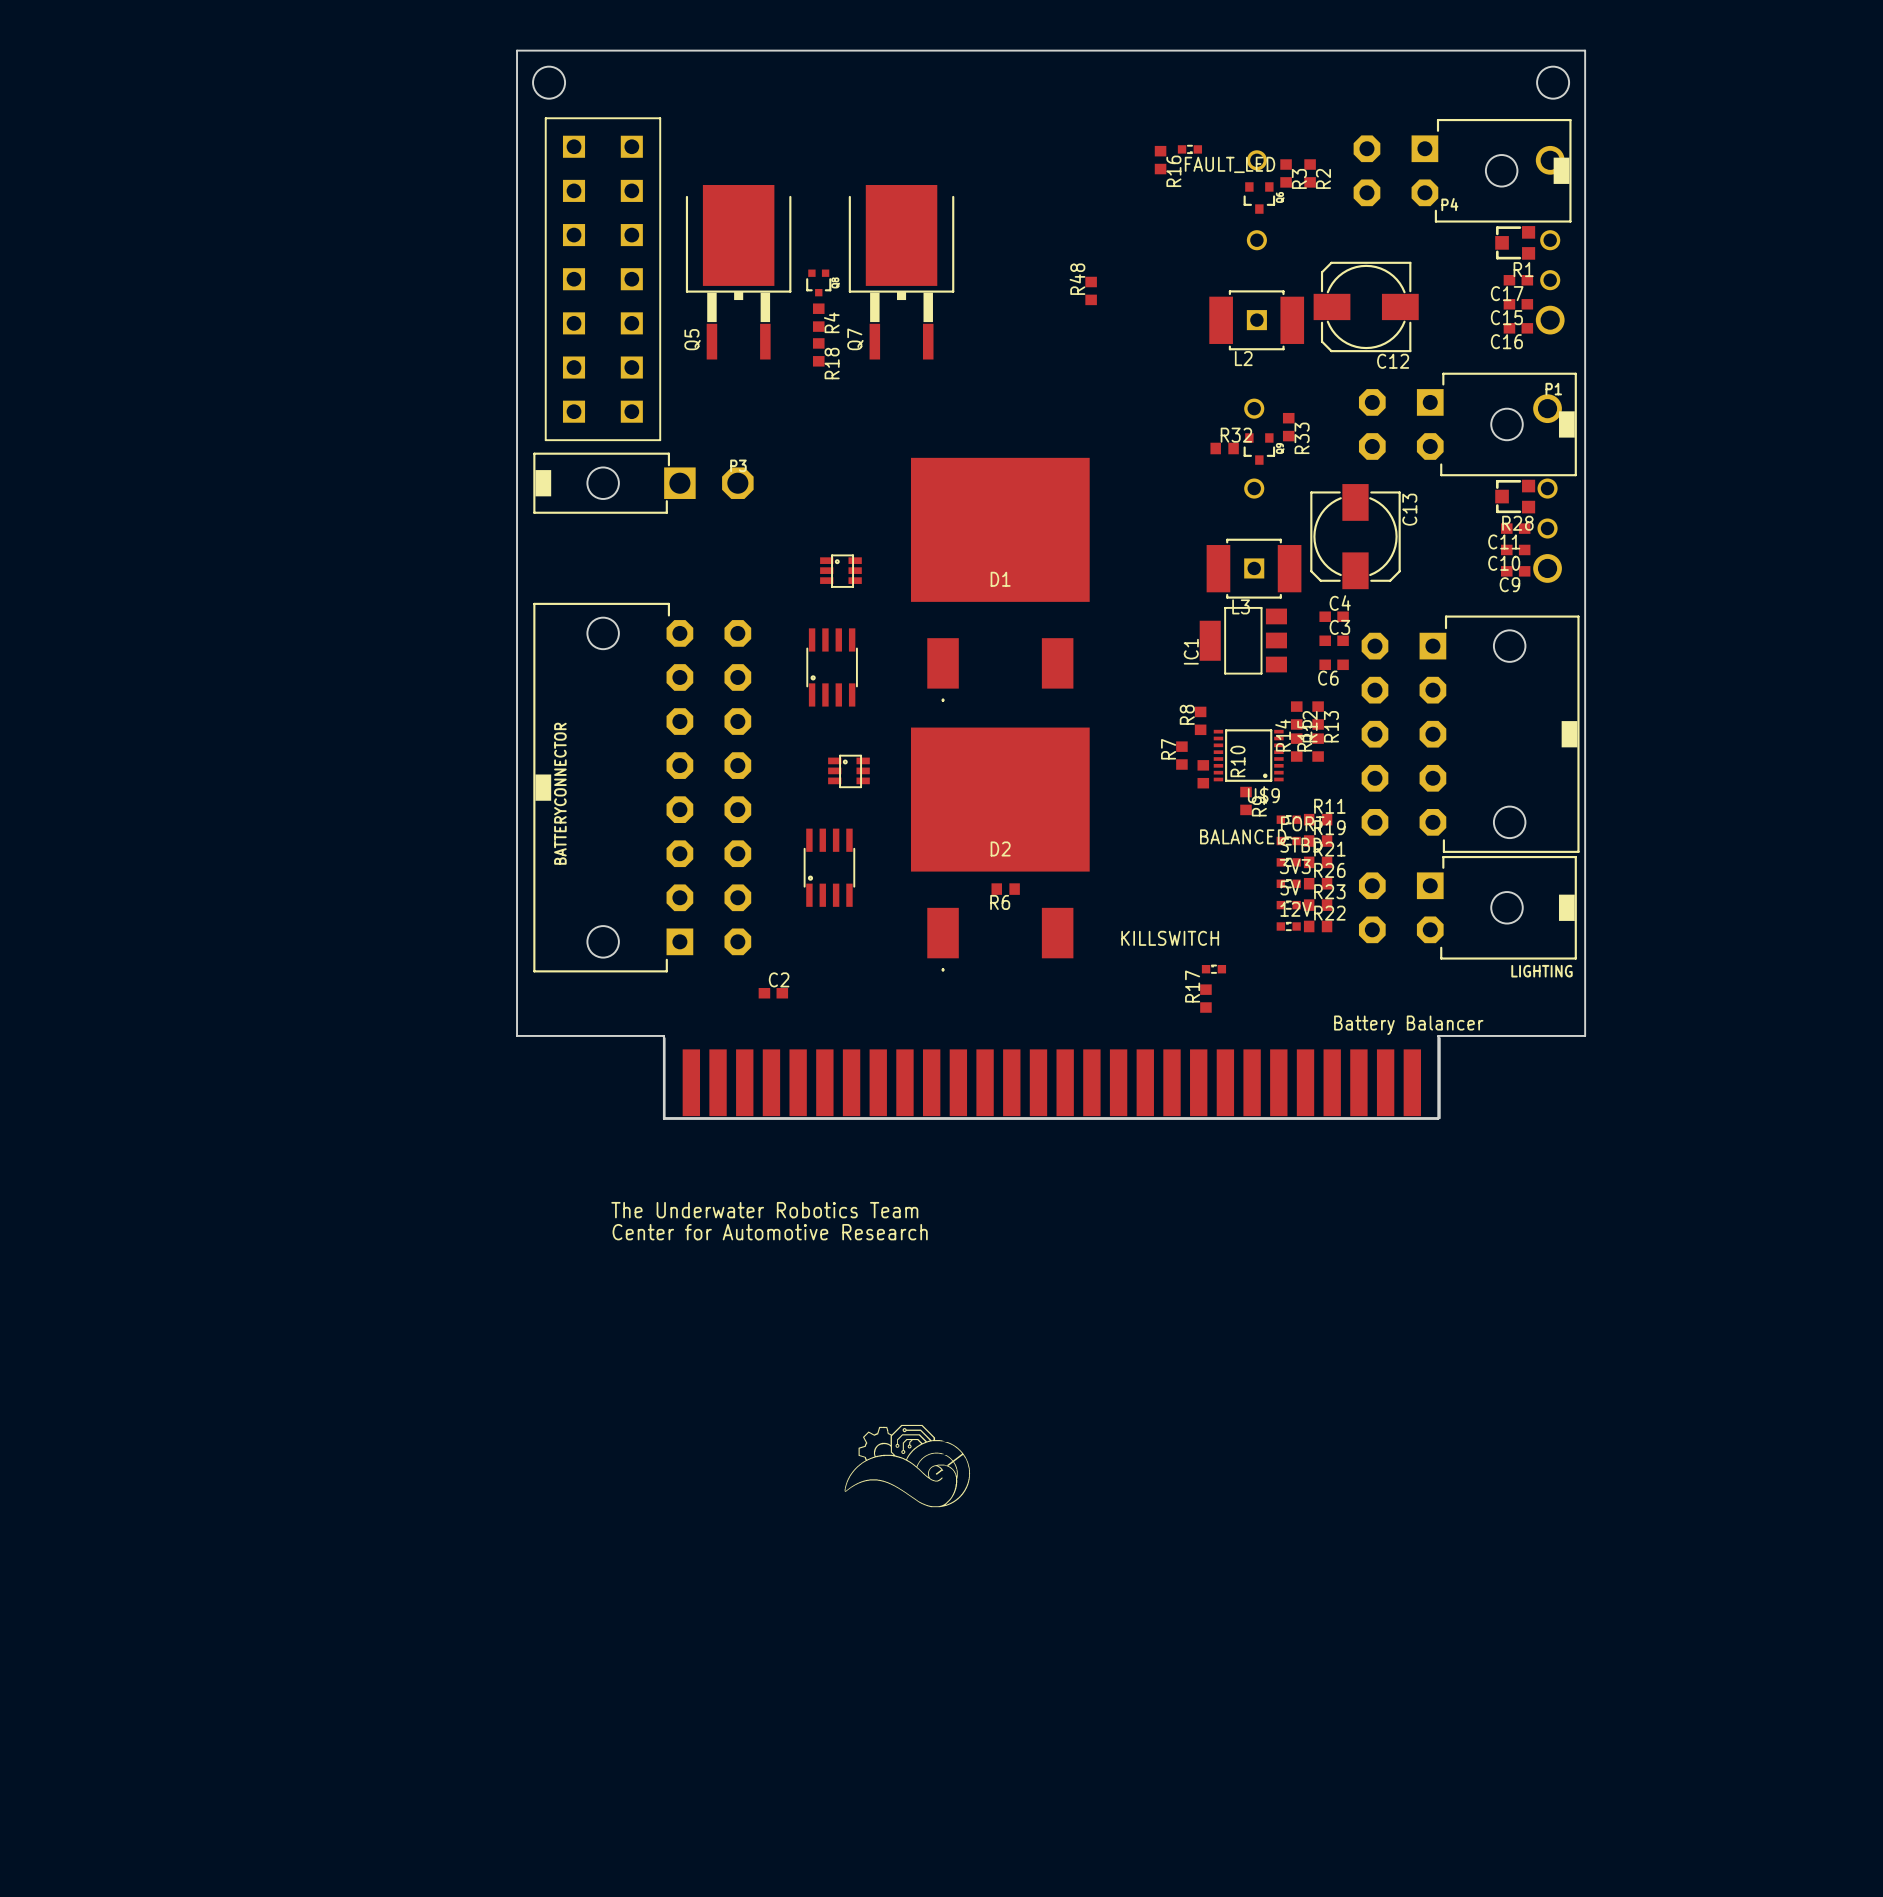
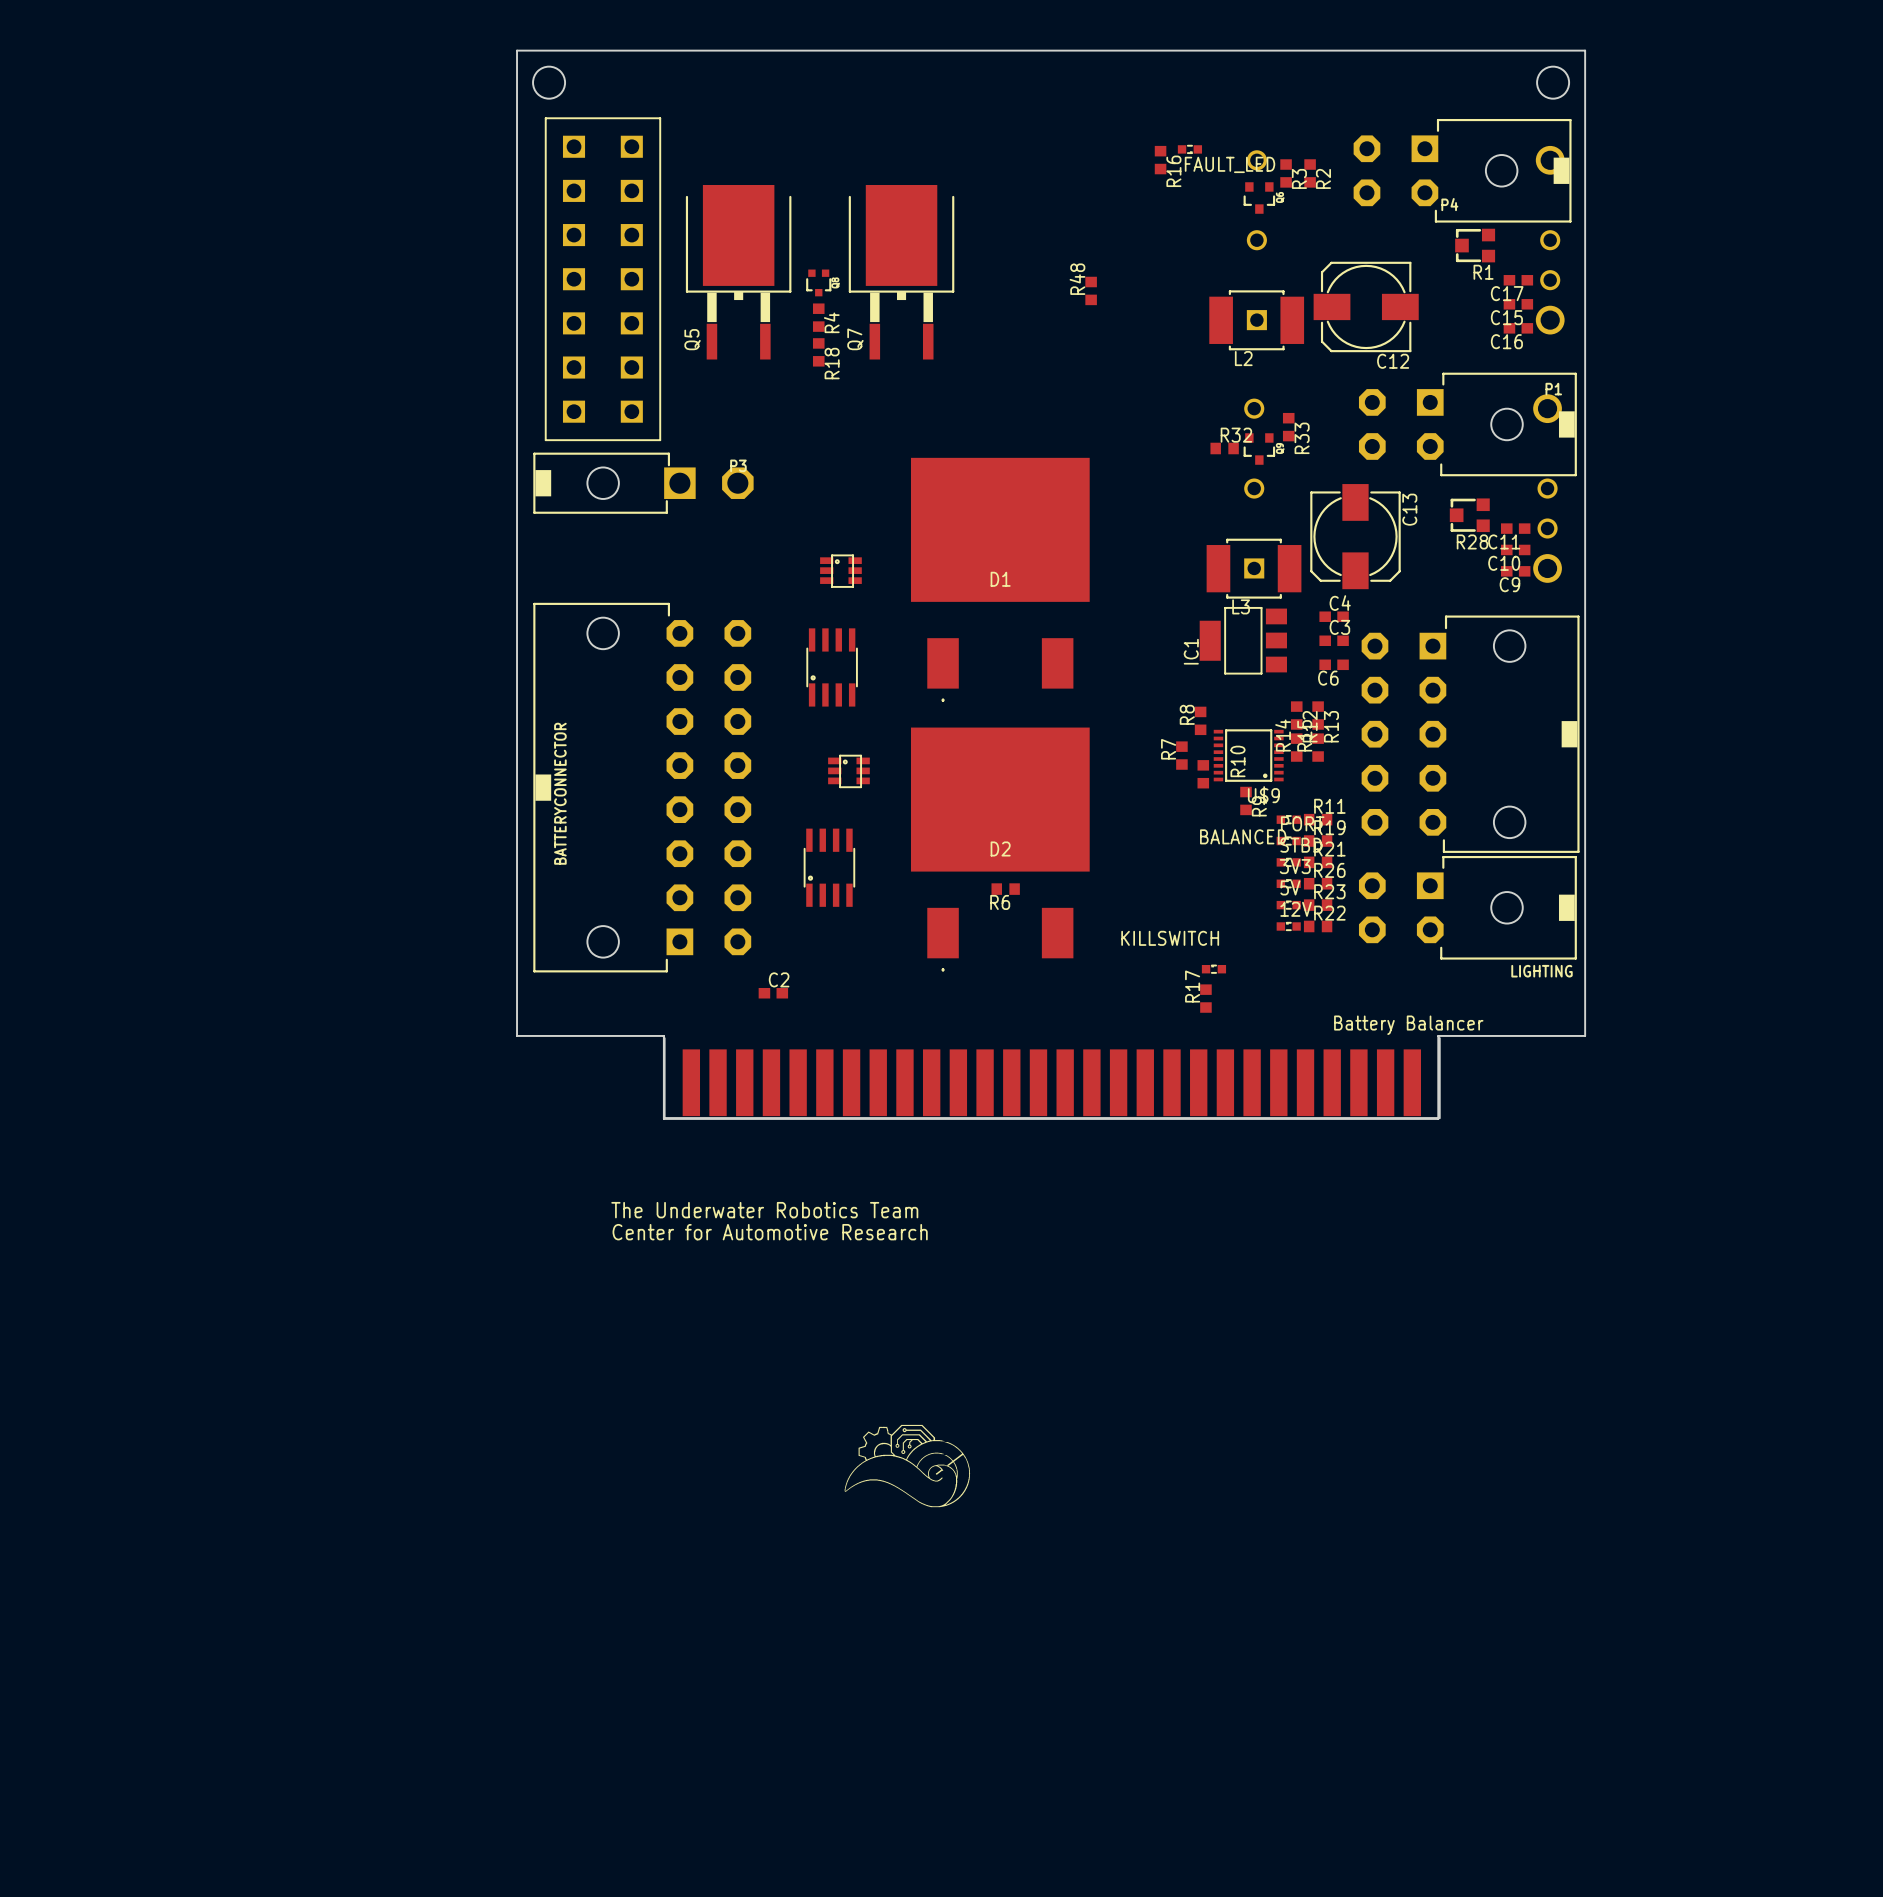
R1 position: (1515, 242) -> (1475, 245)
R28 position: (1515, 496) -> (1469, 515)

